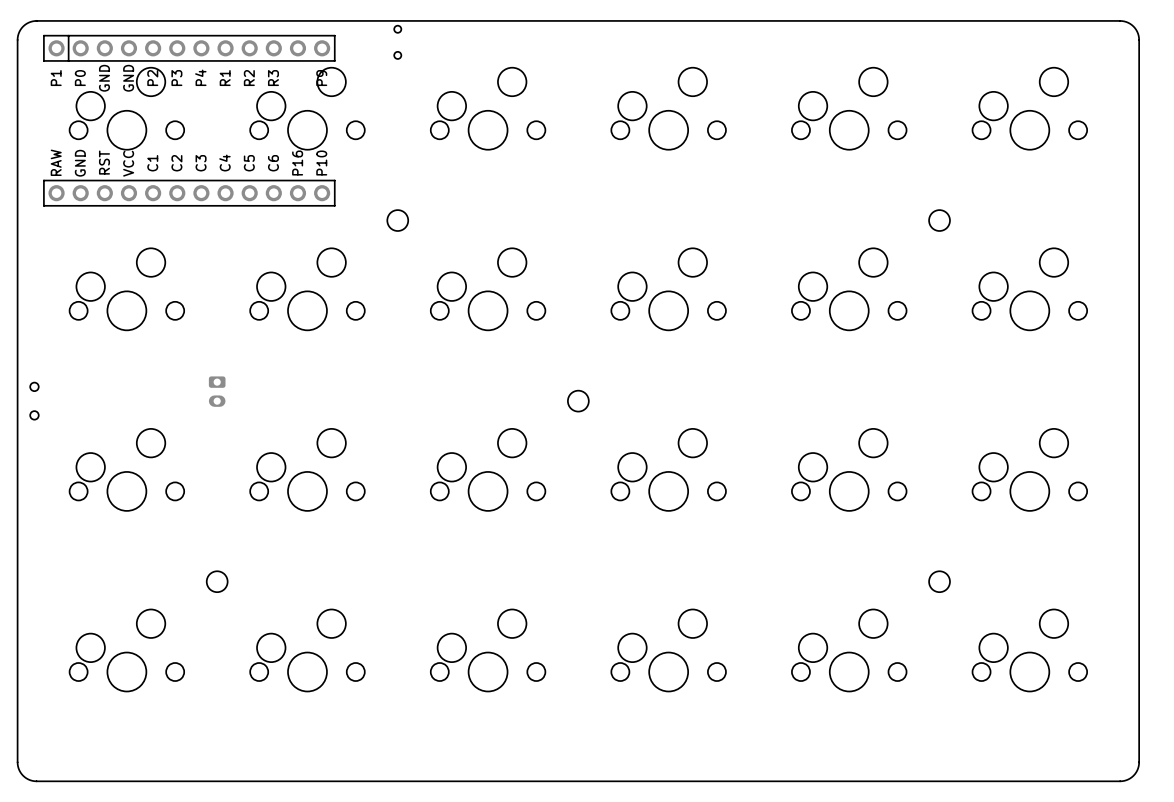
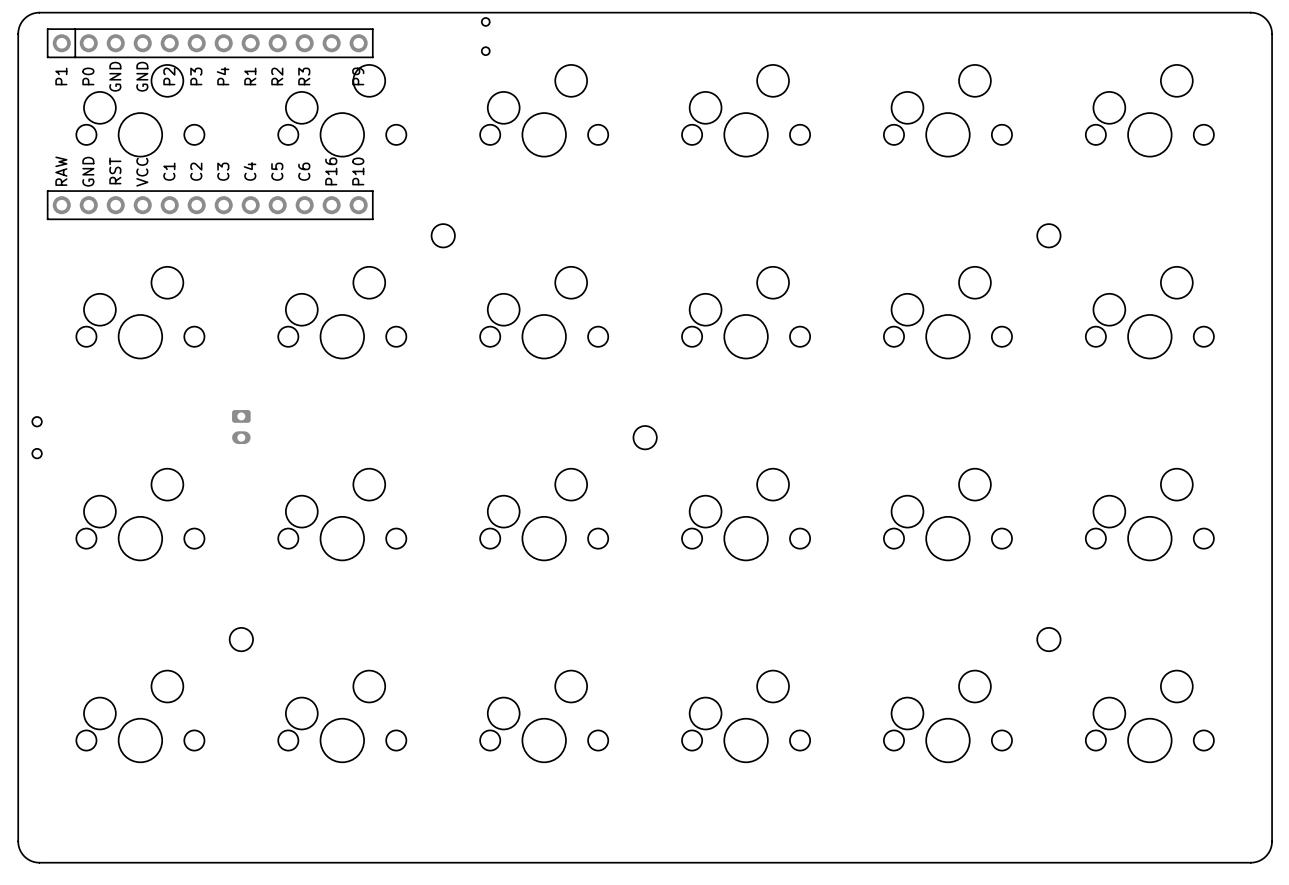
part position: (397, 42) -> (485, 36)

